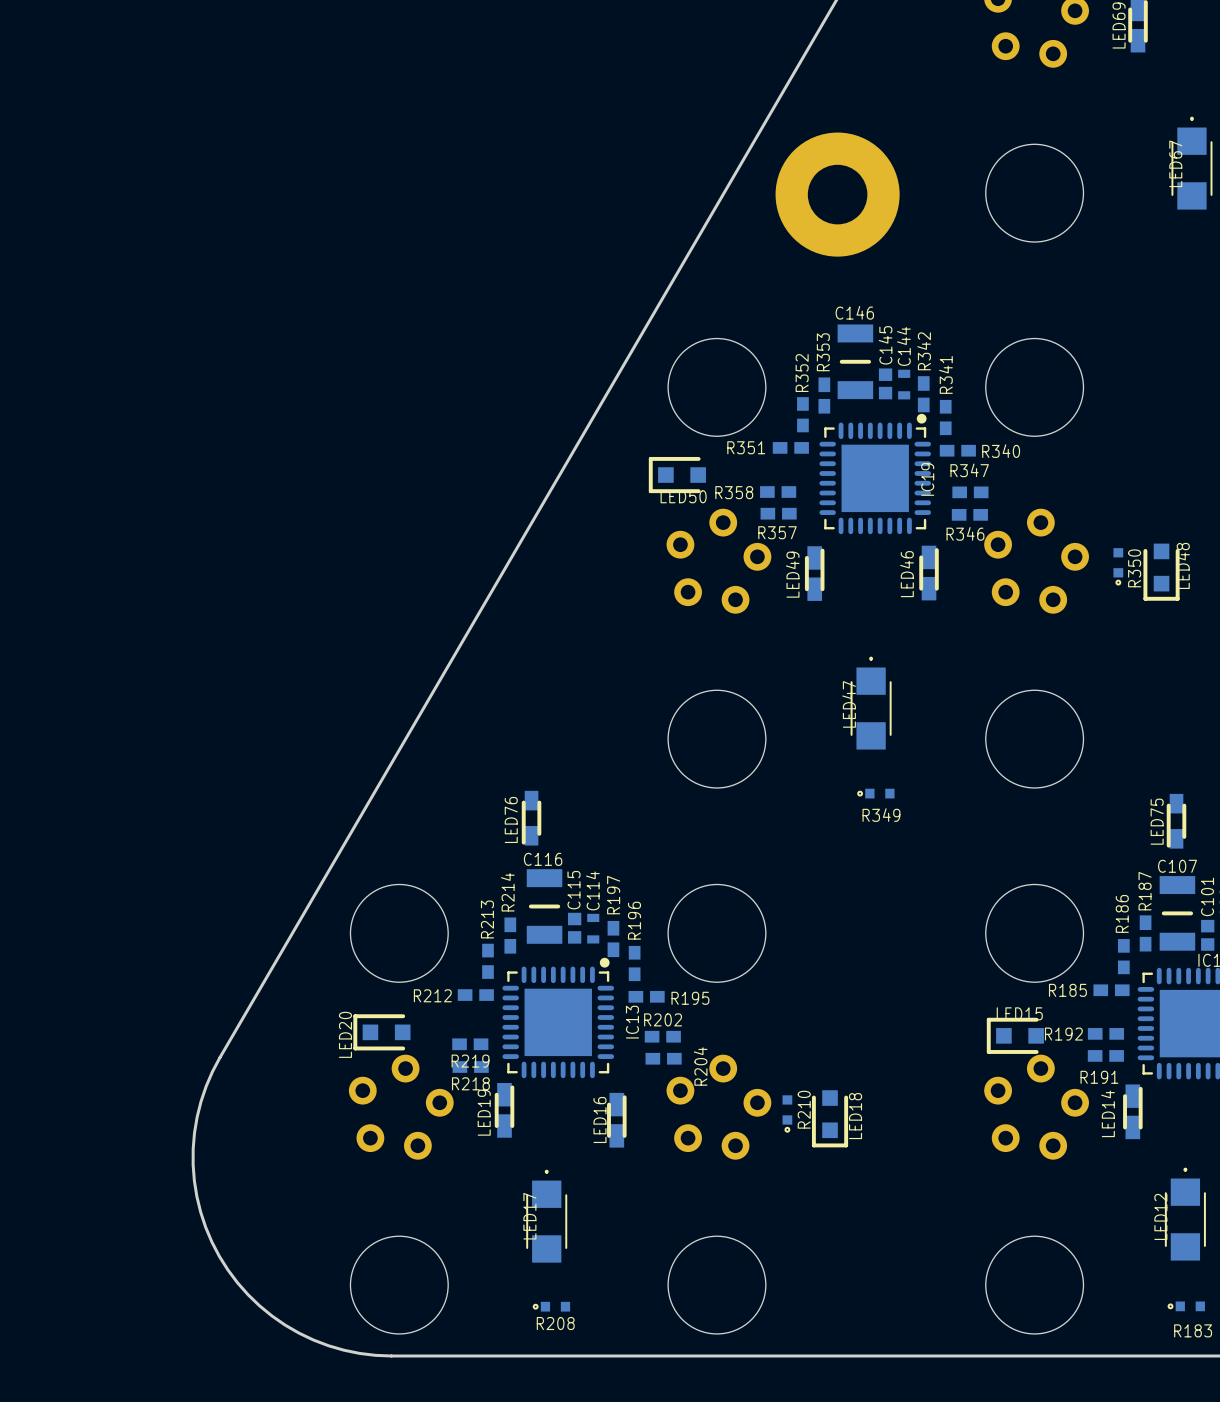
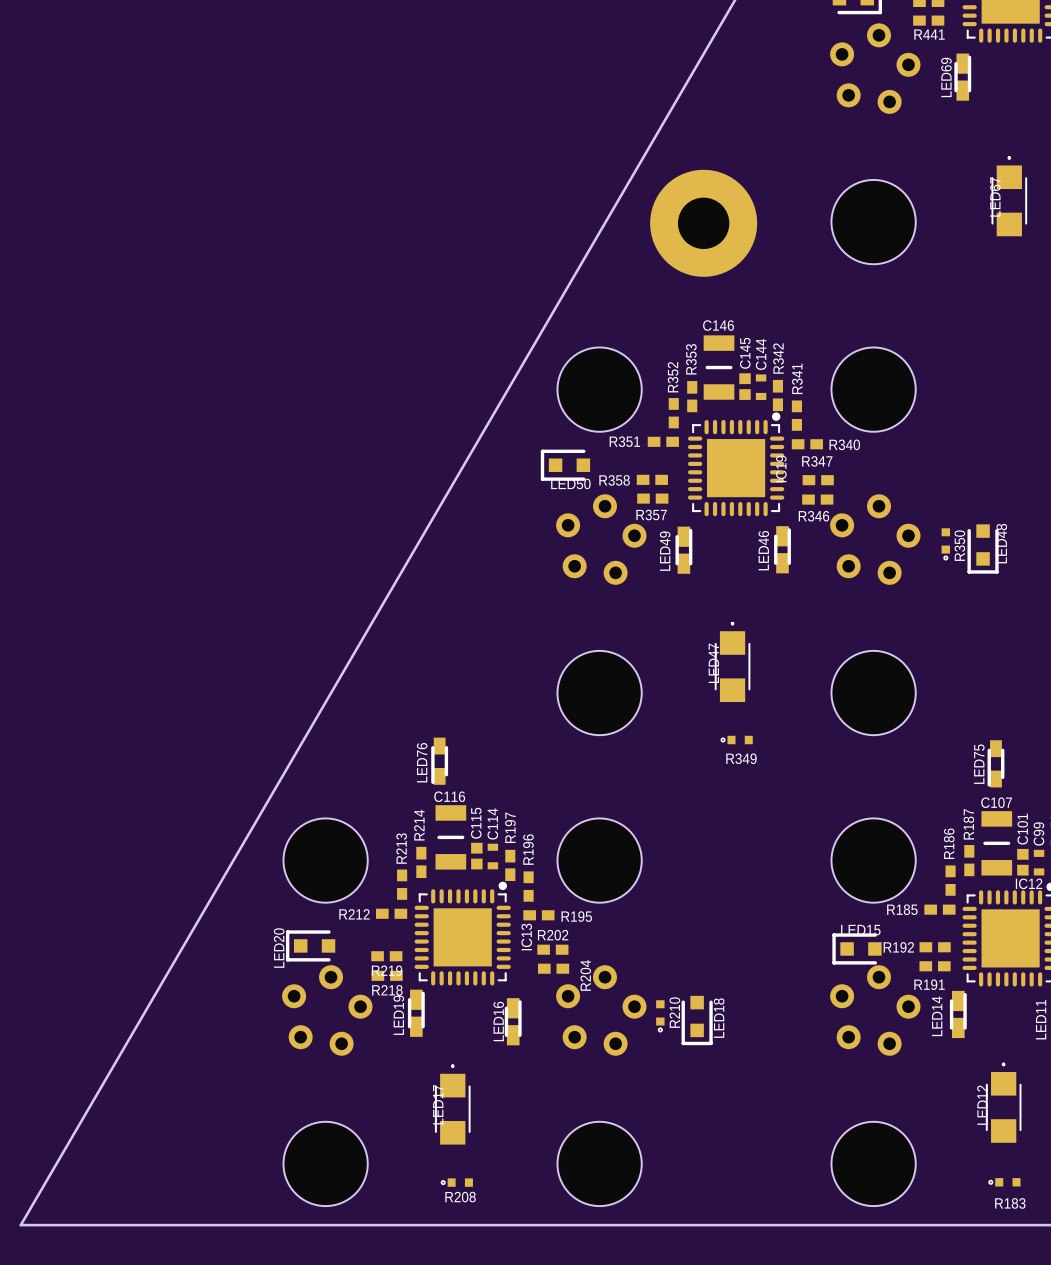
board edge: (220, 1057) (201, 1101) (193, 1148) (194, 1180) (200, 1212) (219, 1256) (237, 1282) (259, 1305) (299, 1333) (343, 1350) (391, 1356) -> (170, 967) (20, 1225) (318, 1225)

